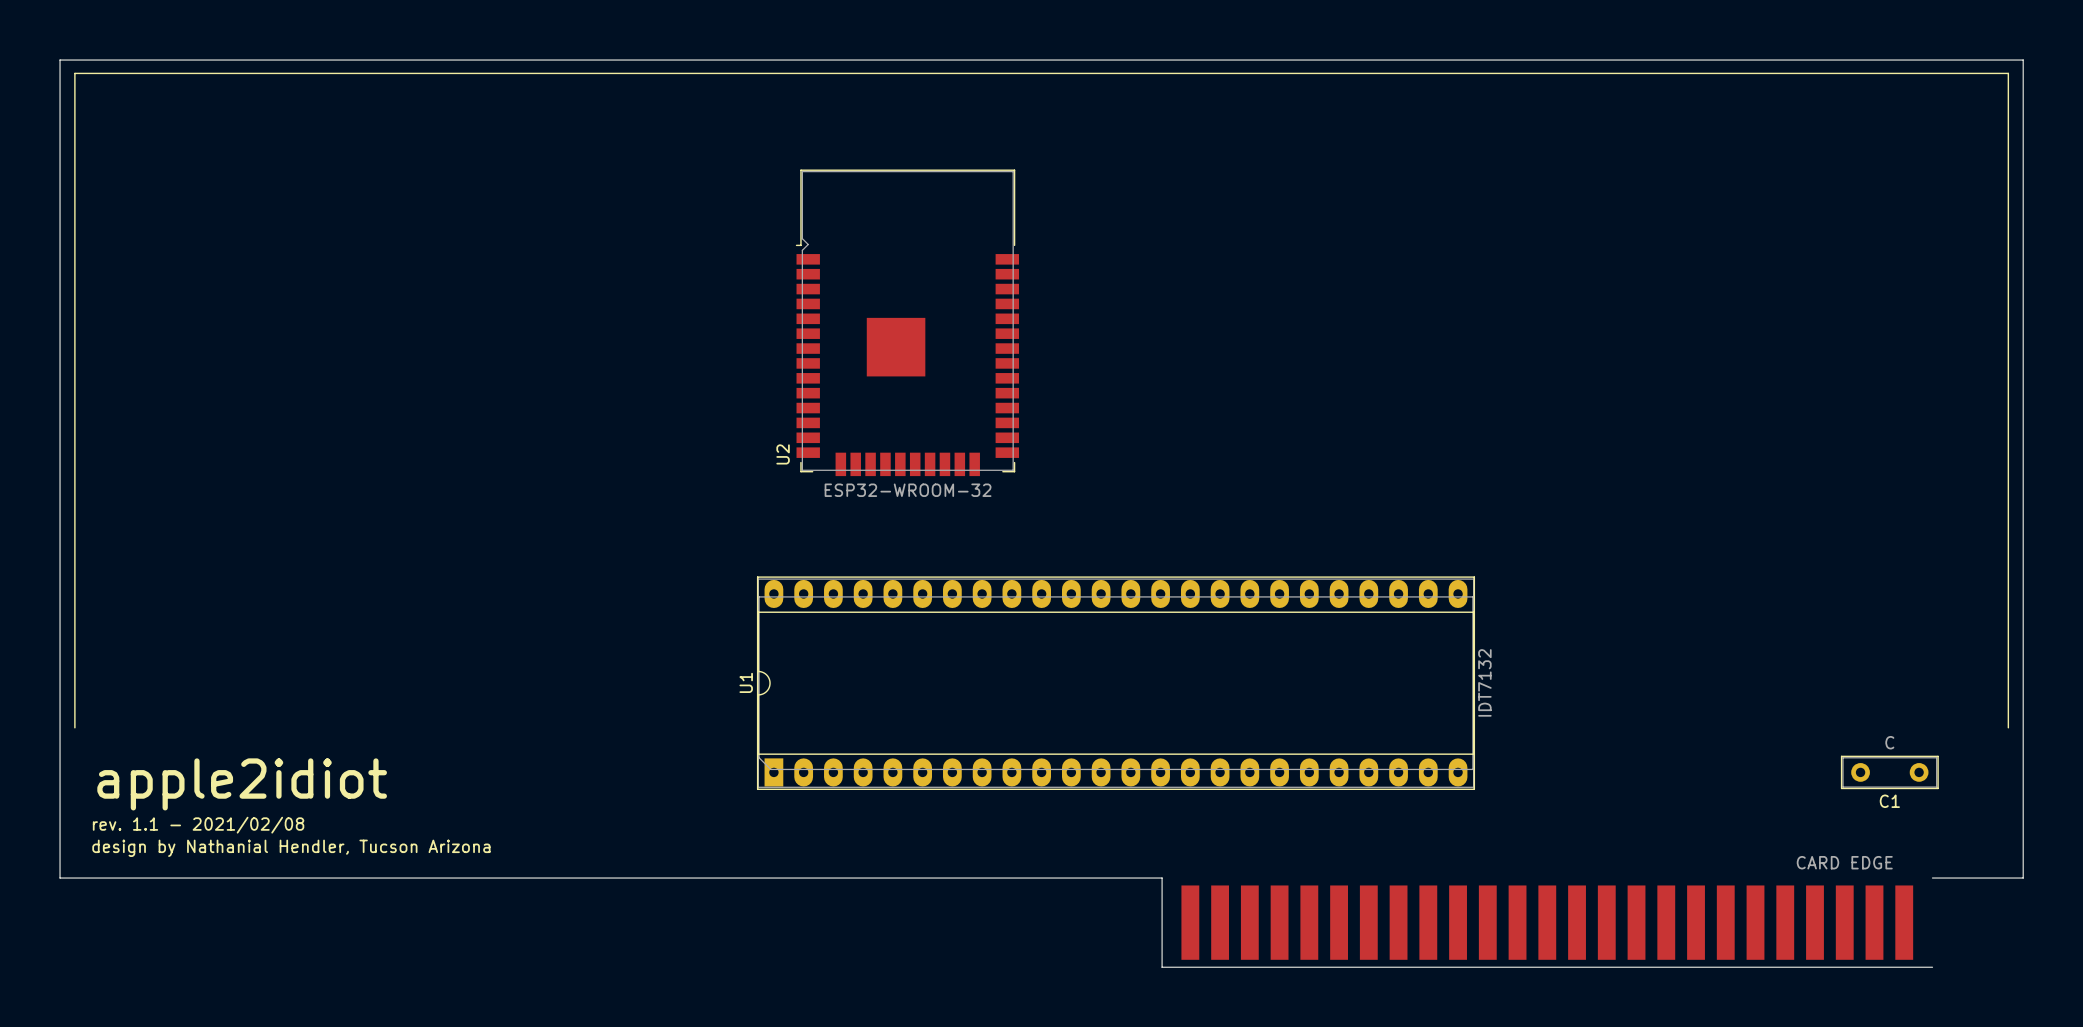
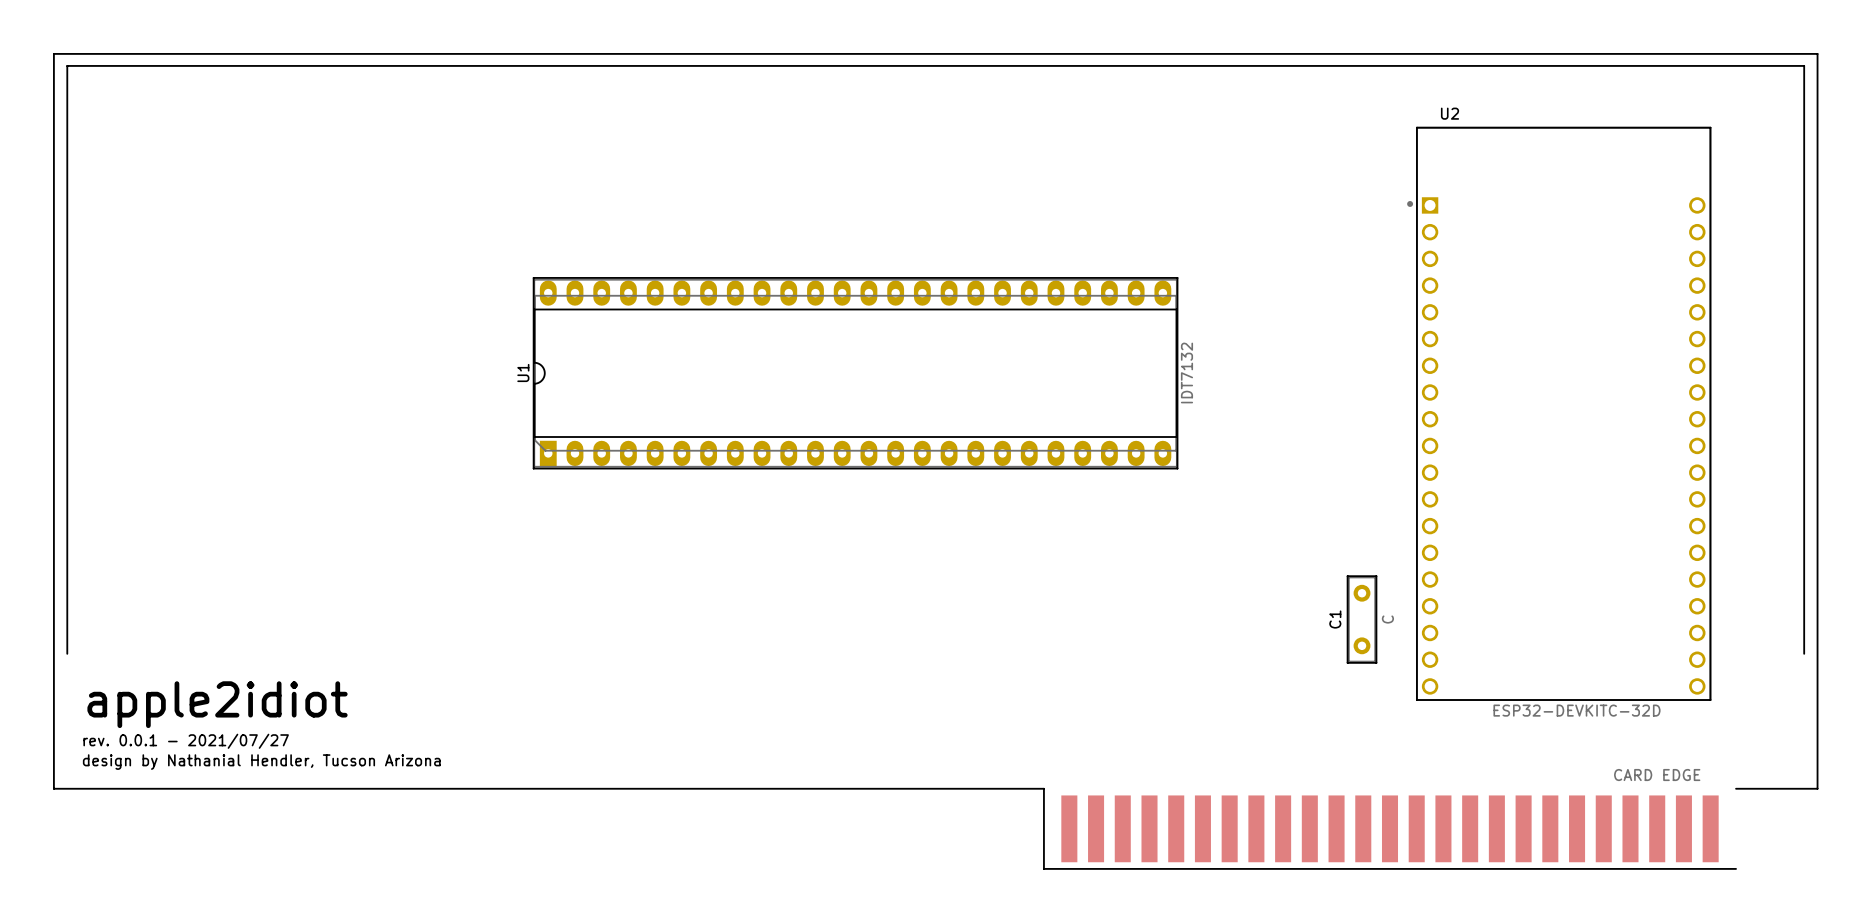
U2 footprint: [795, 169, 1020, 477] -> [1407, 127, 1712, 701]
U2 name position: U2 (783, 454) -> U2 (1450, 113)
U2 value: ESP32-WROOM-32 (908, 490) -> ESP32-DEVKITC-32D (1576, 710)
U1 position: (1115, 683) -> (855, 373)
C1 rotation: 0° (1889, 772) -> 90° clockwise (1362, 619)
C1 position: (1889, 772) -> (1362, 619)
text: rev. 1.1 - 2021/02/08 (198, 825) -> rev. 0.0.1 - 2021/07/27 (186, 741)

